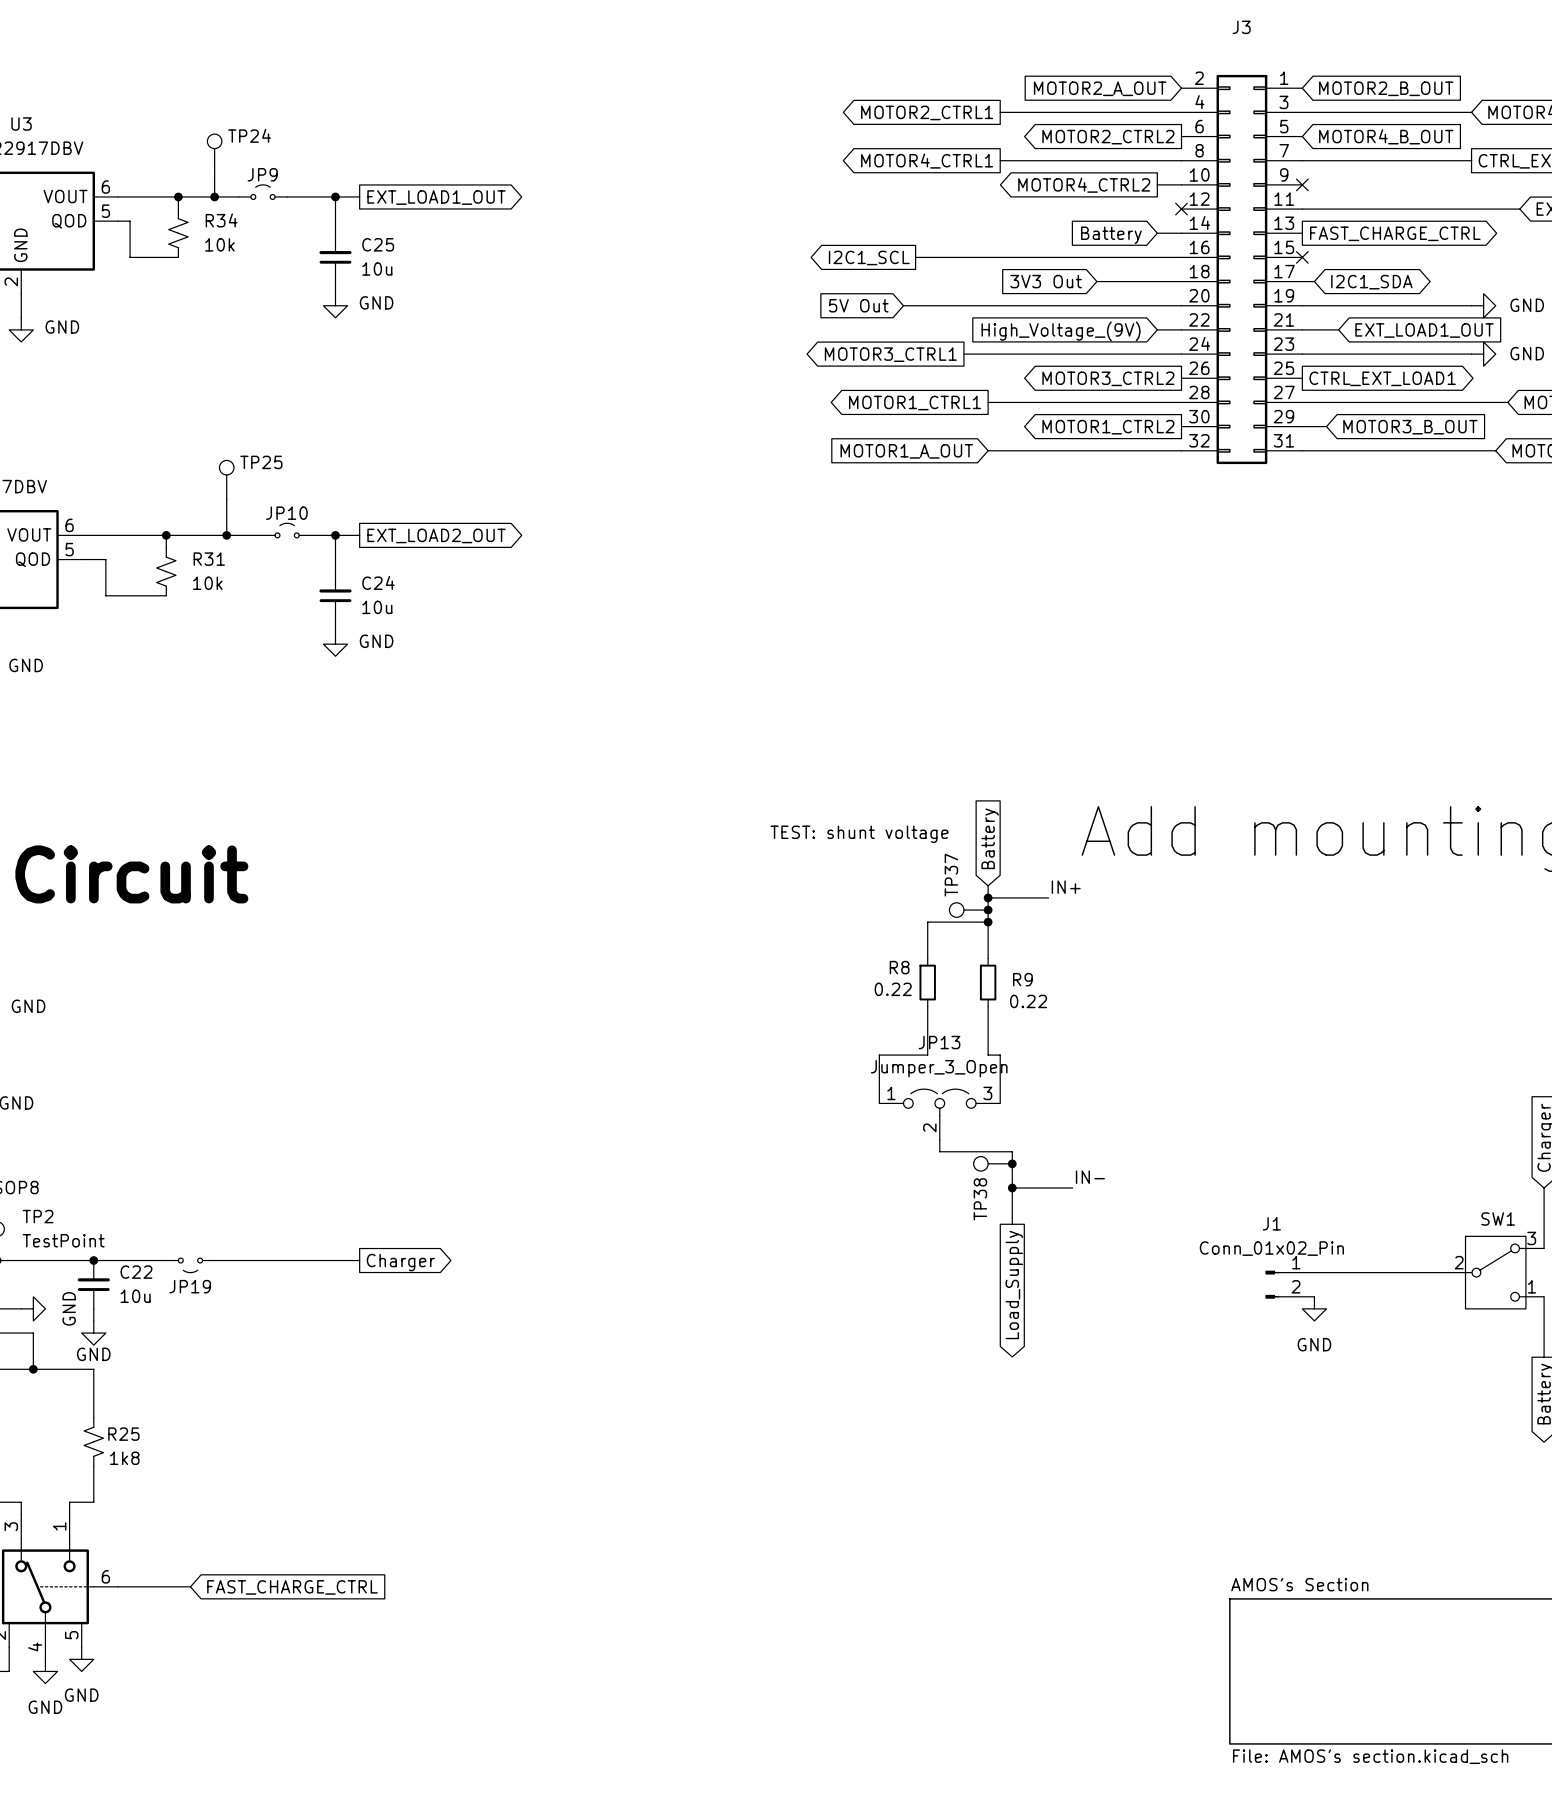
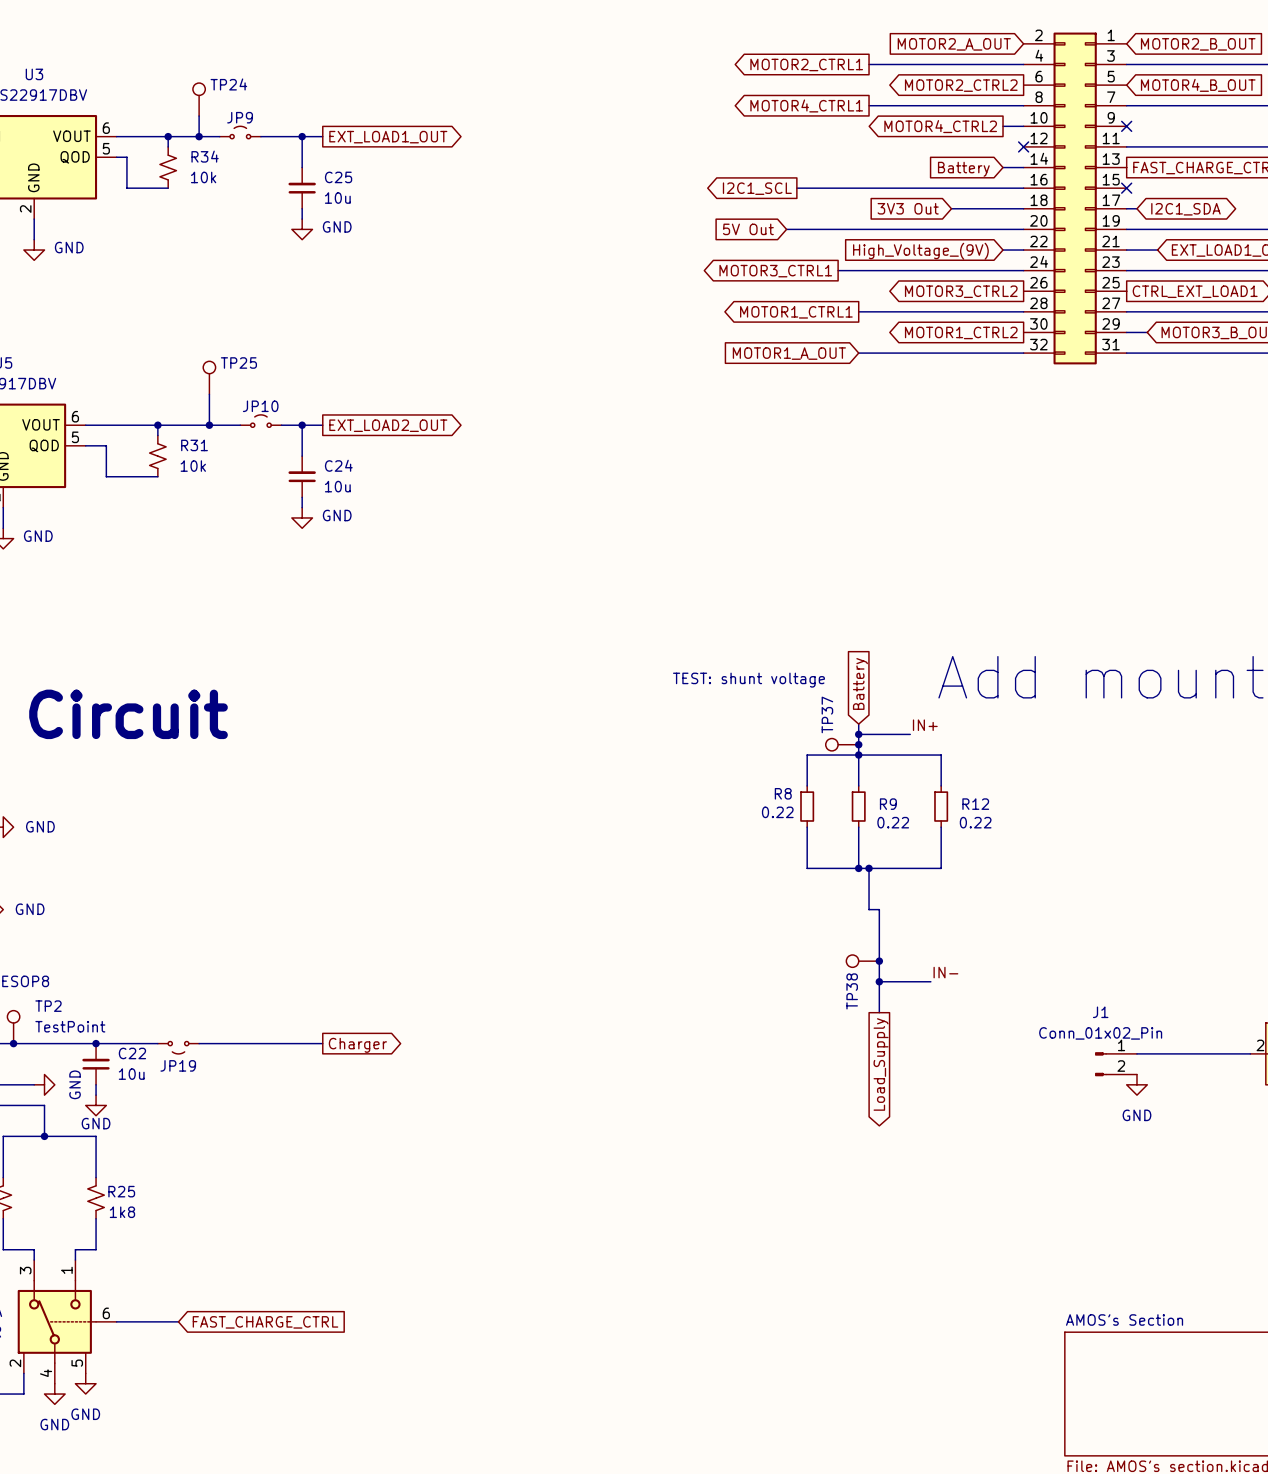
wire: none -> (858, 755) (941, 755) (941, 785)
R12: none -> 0.22 (941, 806)
wire: none -> (941, 827) (941, 868) (869, 868)
wire: (927, 1055) (879, 1055) (879, 1103) -> (807, 868) (858, 868)
junction: none -> (858, 868)
junction: none -> (869, 868)
JP13: Jumper_3_Open (939, 1114) -> none
wire: (939, 1139) (939, 1151) (1012, 1151) -> (869, 909) (879, 909) (879, 950)

